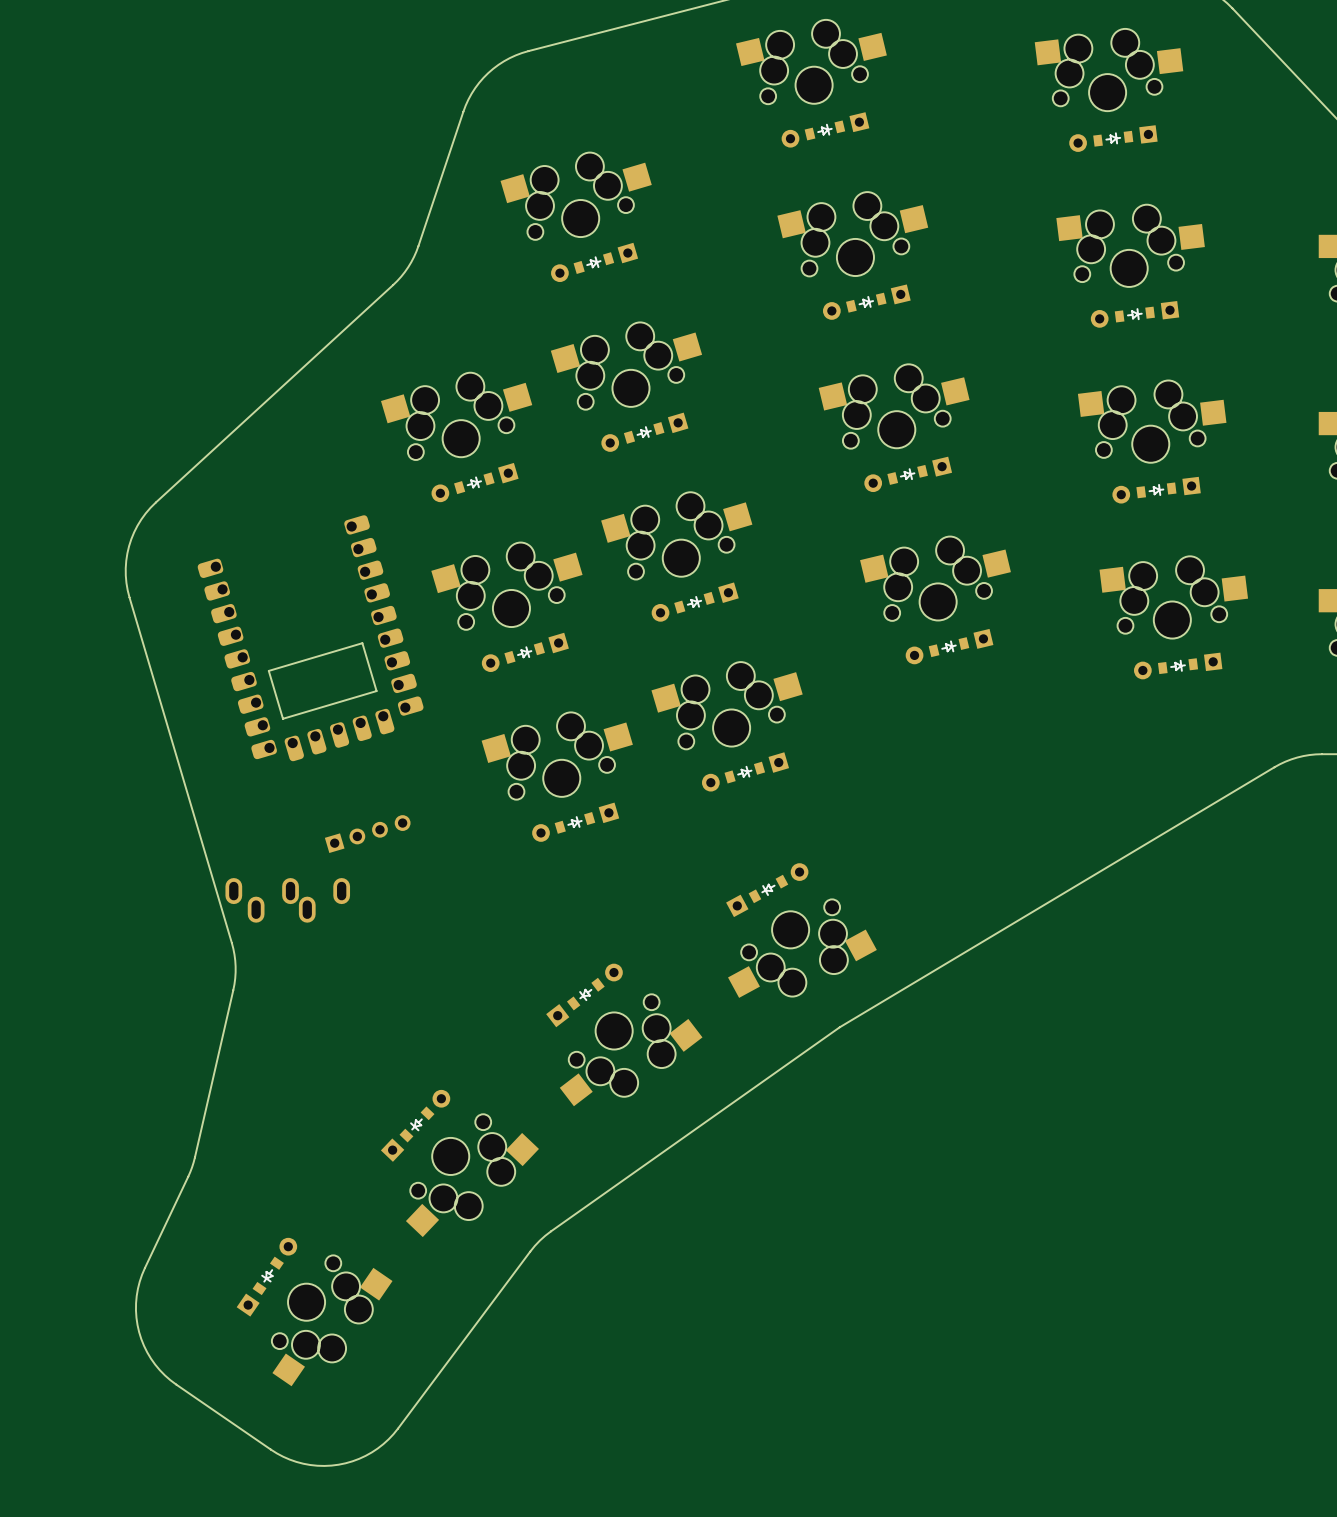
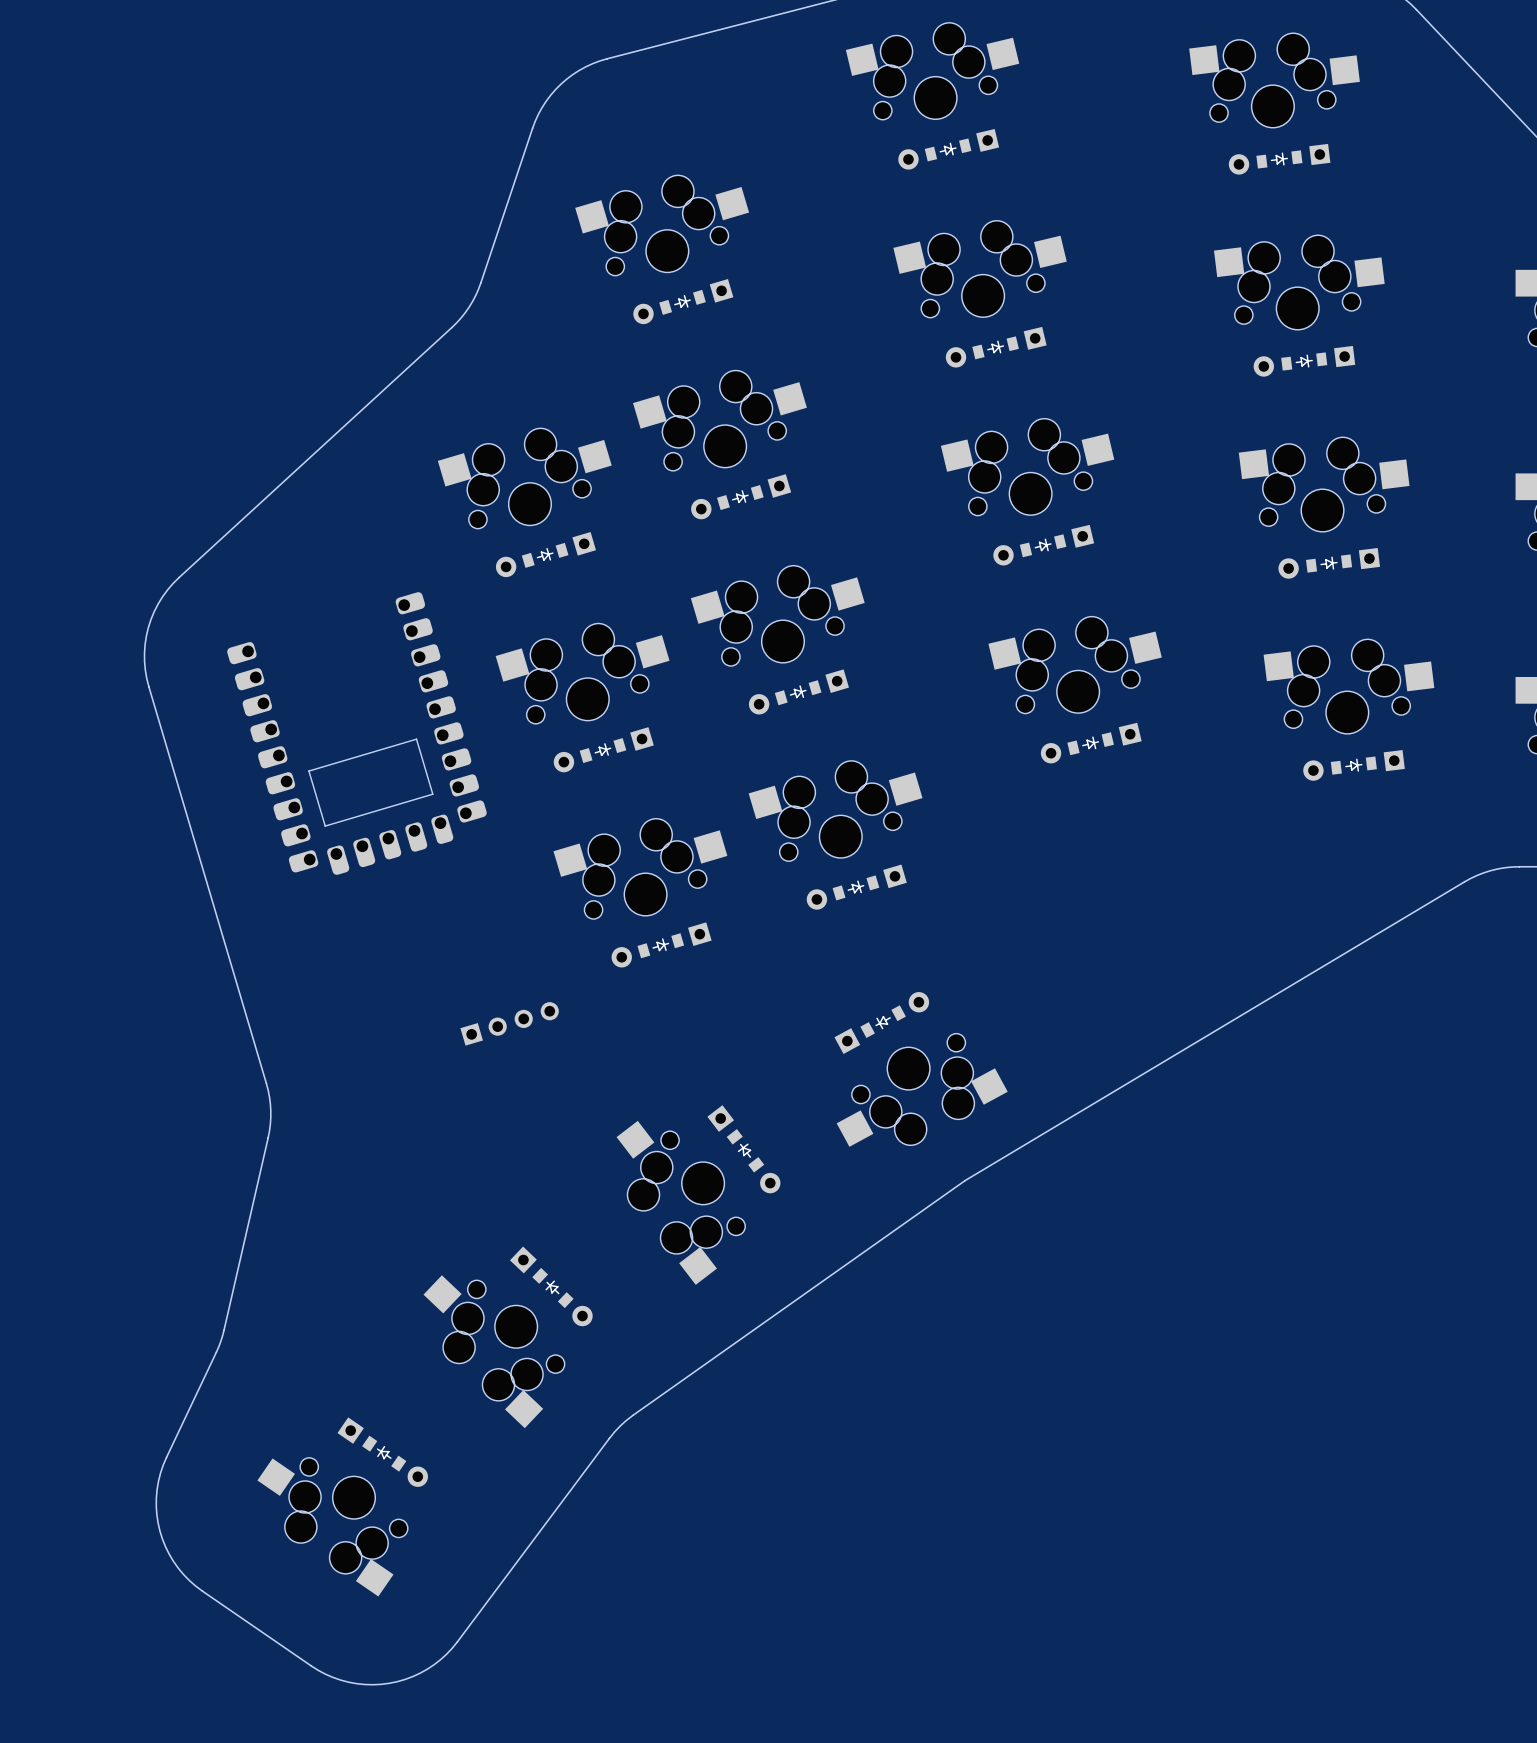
part position: (367, 834) -> (509, 1023)
part: (287, 900) -> none
part rotation: 0° (584, 995) -> 90° clockwise (743, 1149)
part position: (584, 995) -> (743, 1149)
part rotation: 0° (631, 1050) -> 90° clockwise (680, 1202)
part rotation: 0° (415, 1125) -> 90° clockwise (551, 1286)
part position: (415, 1125) -> (551, 1286)
part rotation: 0° (472, 1175) -> 90° clockwise (494, 1351)
part rotation: 0° (266, 1277) -> 90° clockwise (382, 1452)
part position: (266, 1277) -> (382, 1452)
part rotation: 0° (332, 1320) -> 90° clockwise (332, 1527)

